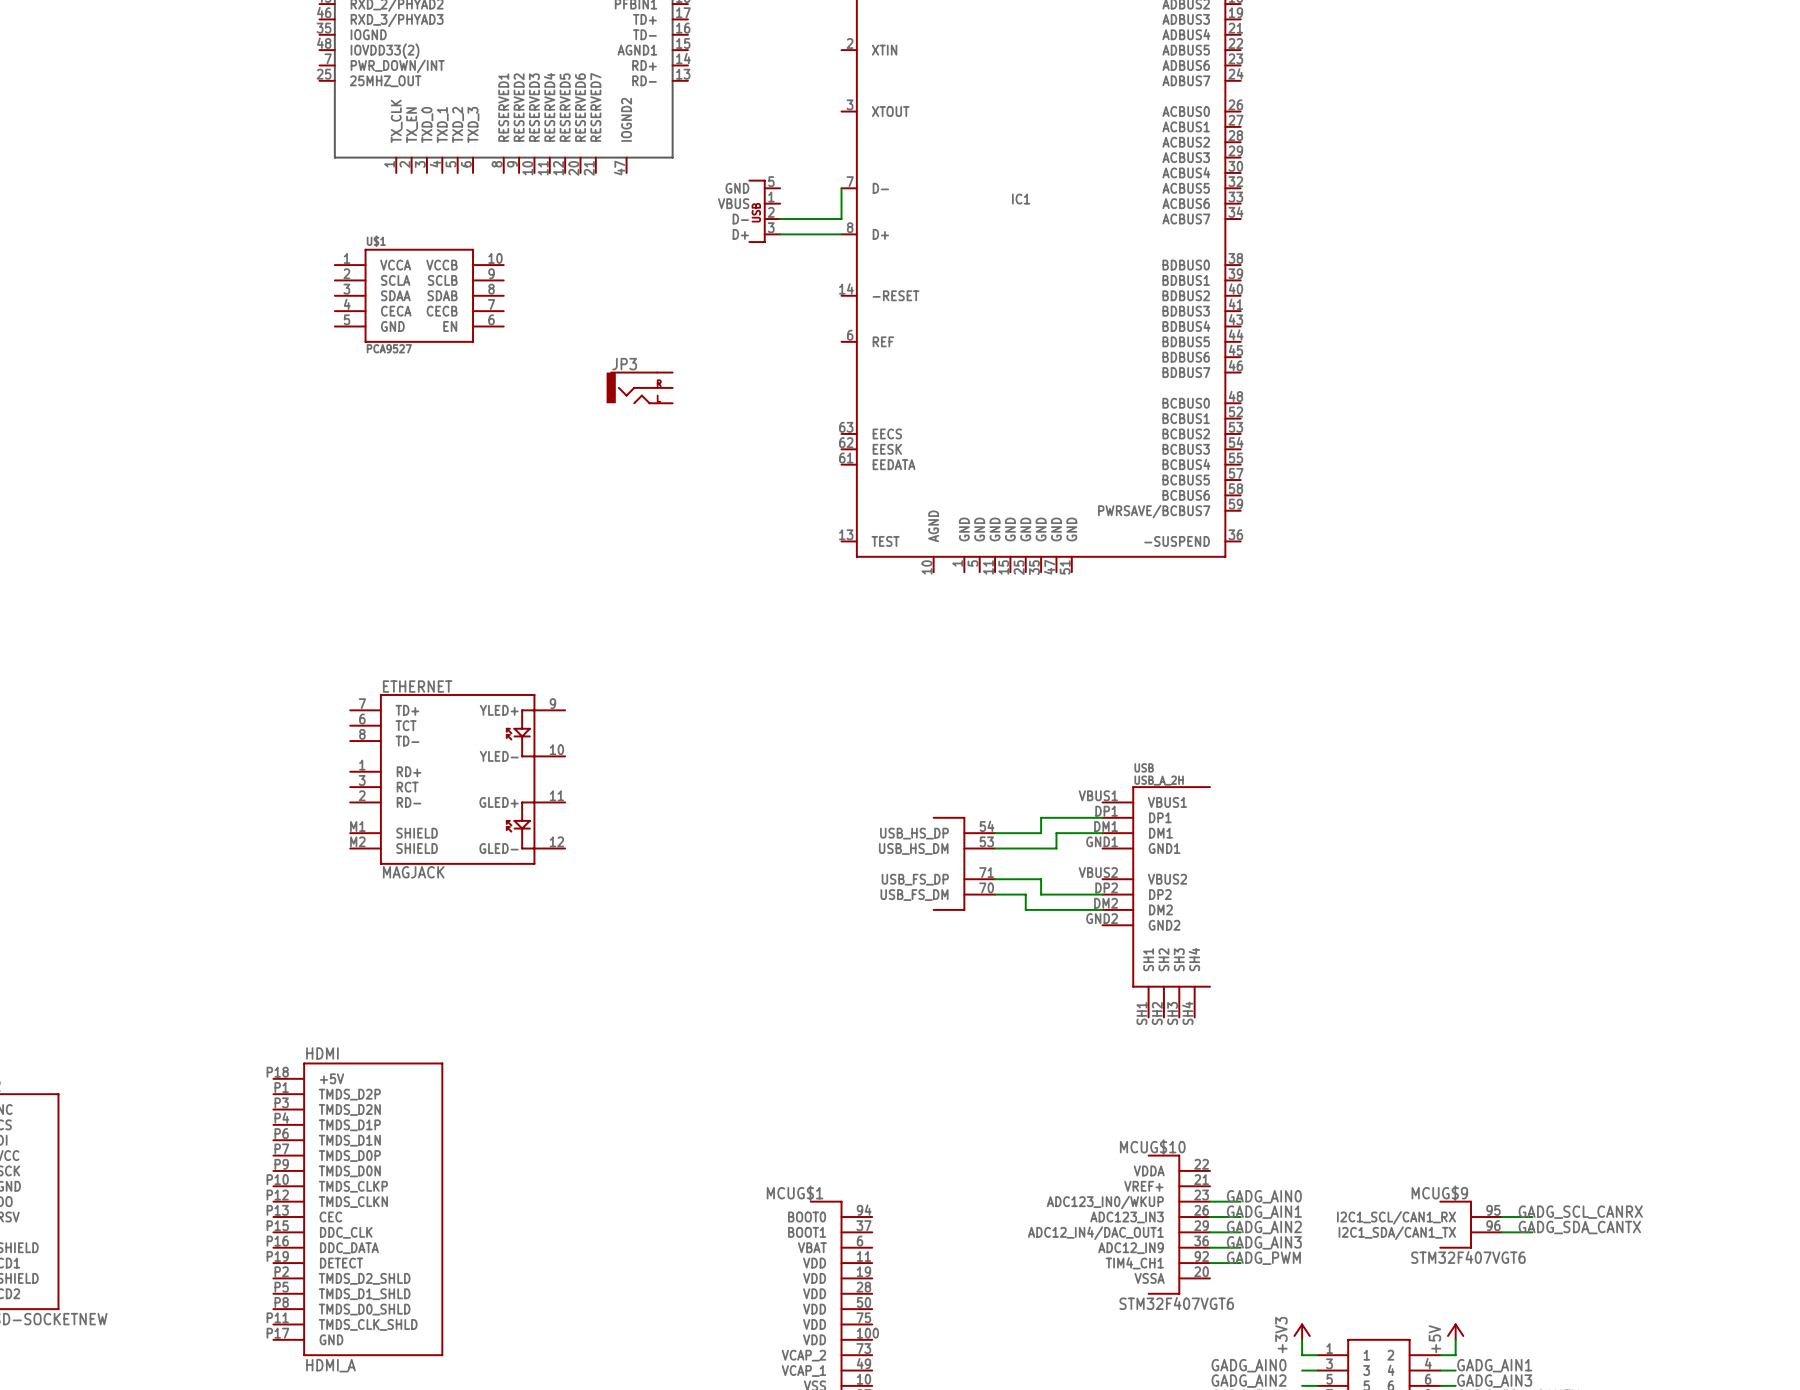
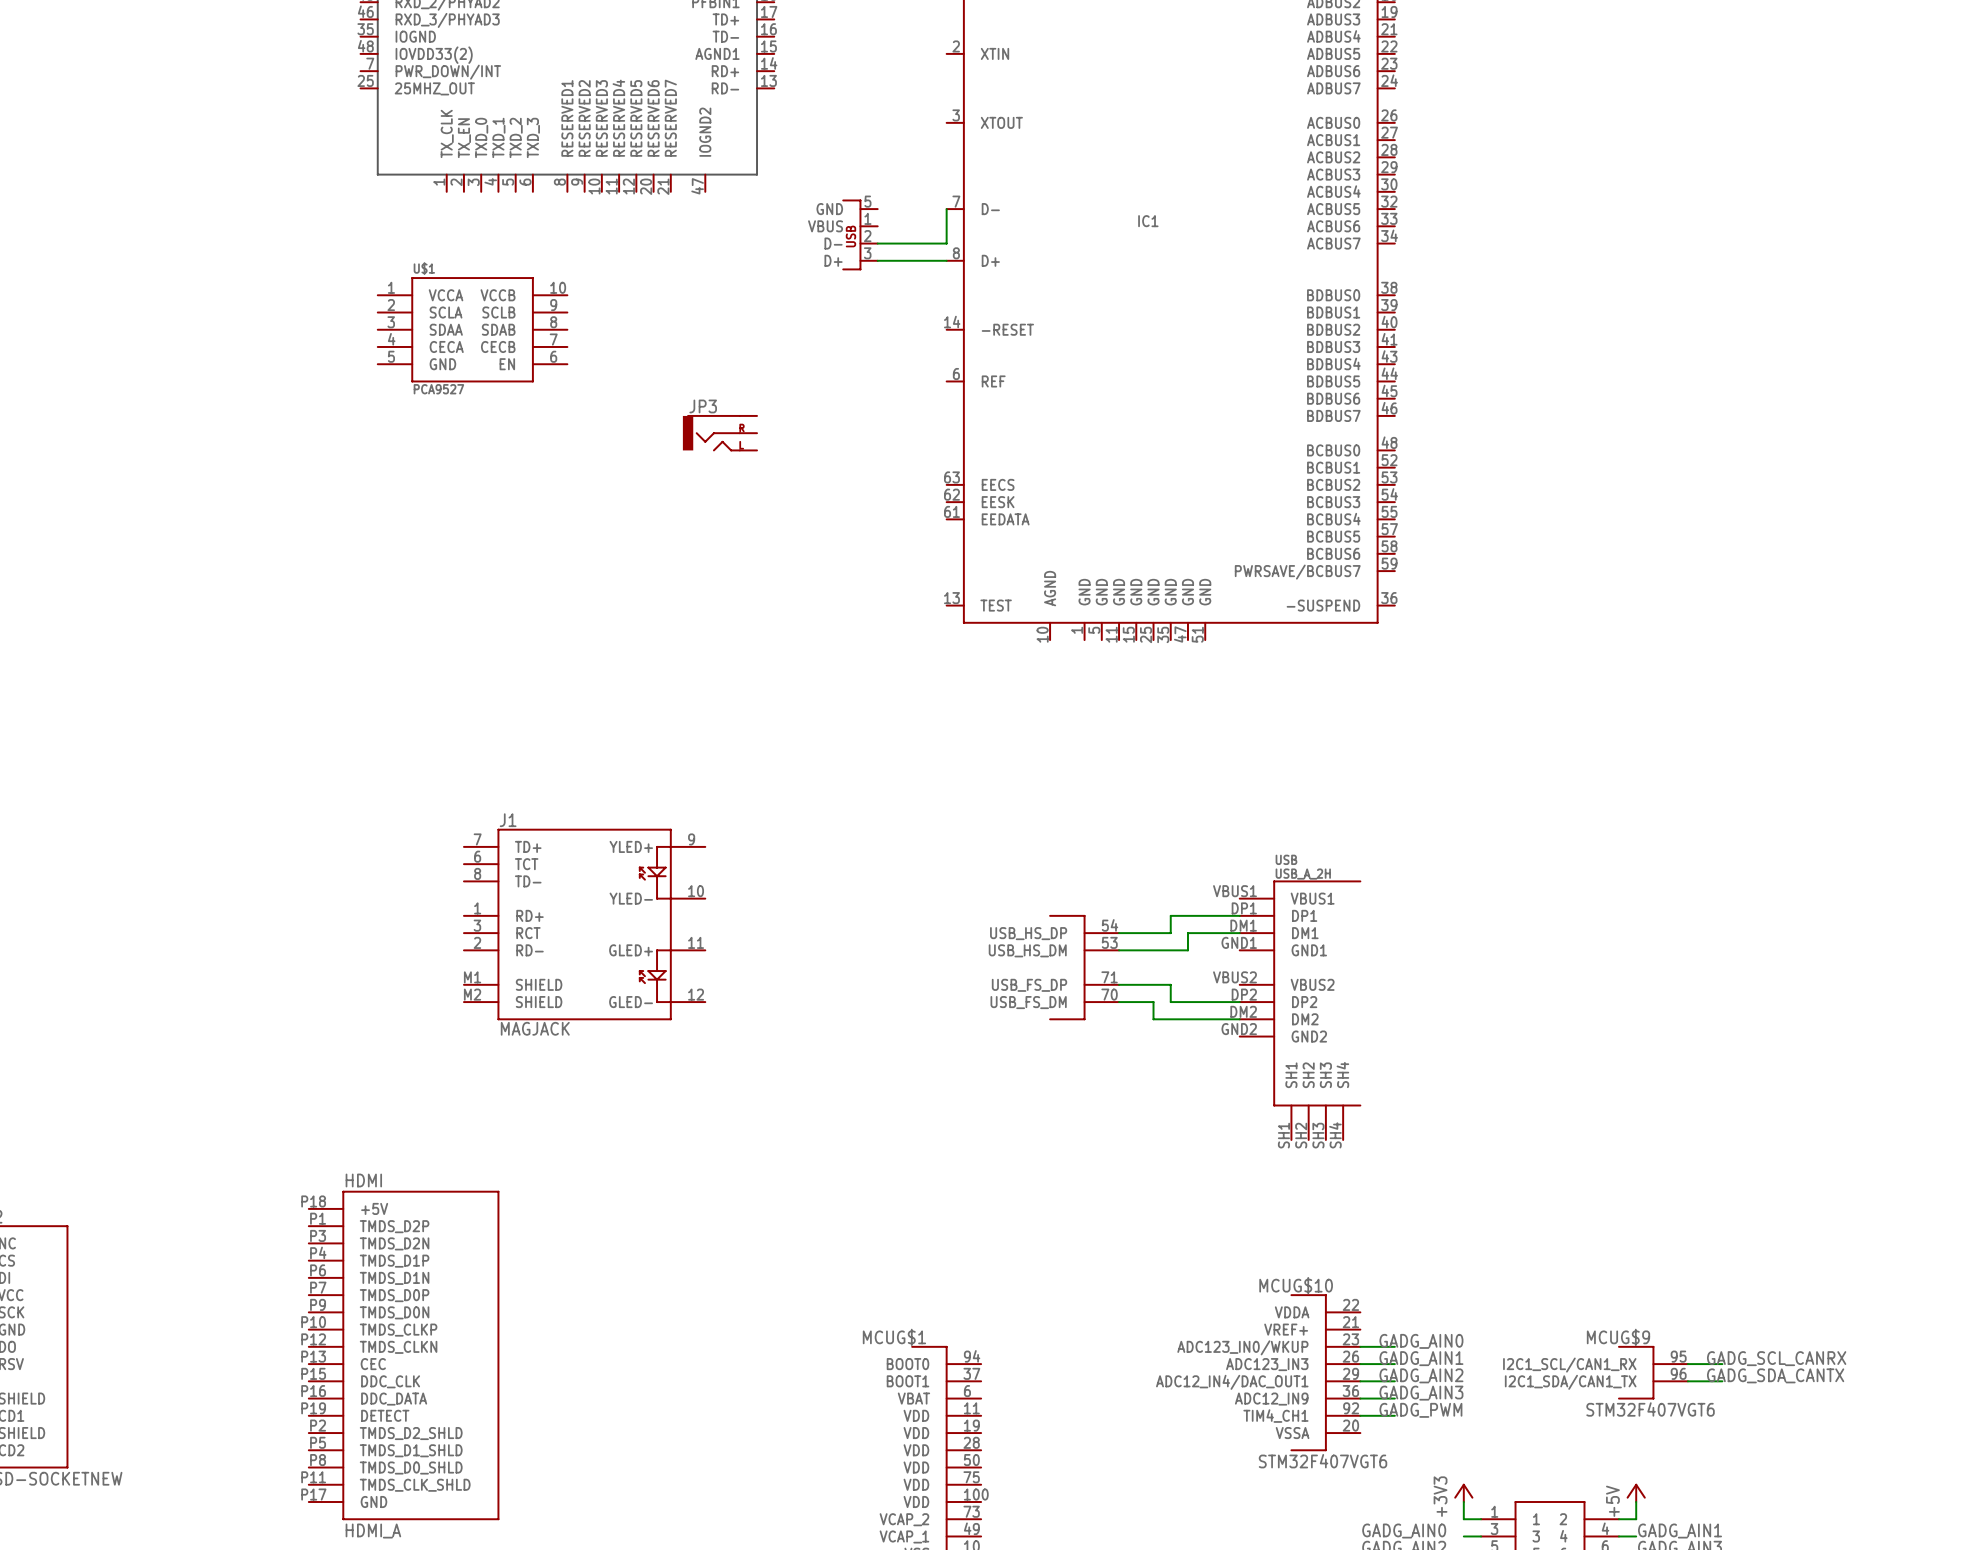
ETHERNET: MAGJACK (457, 779) -> none
J1: none -> MAGJACK (584, 924)

